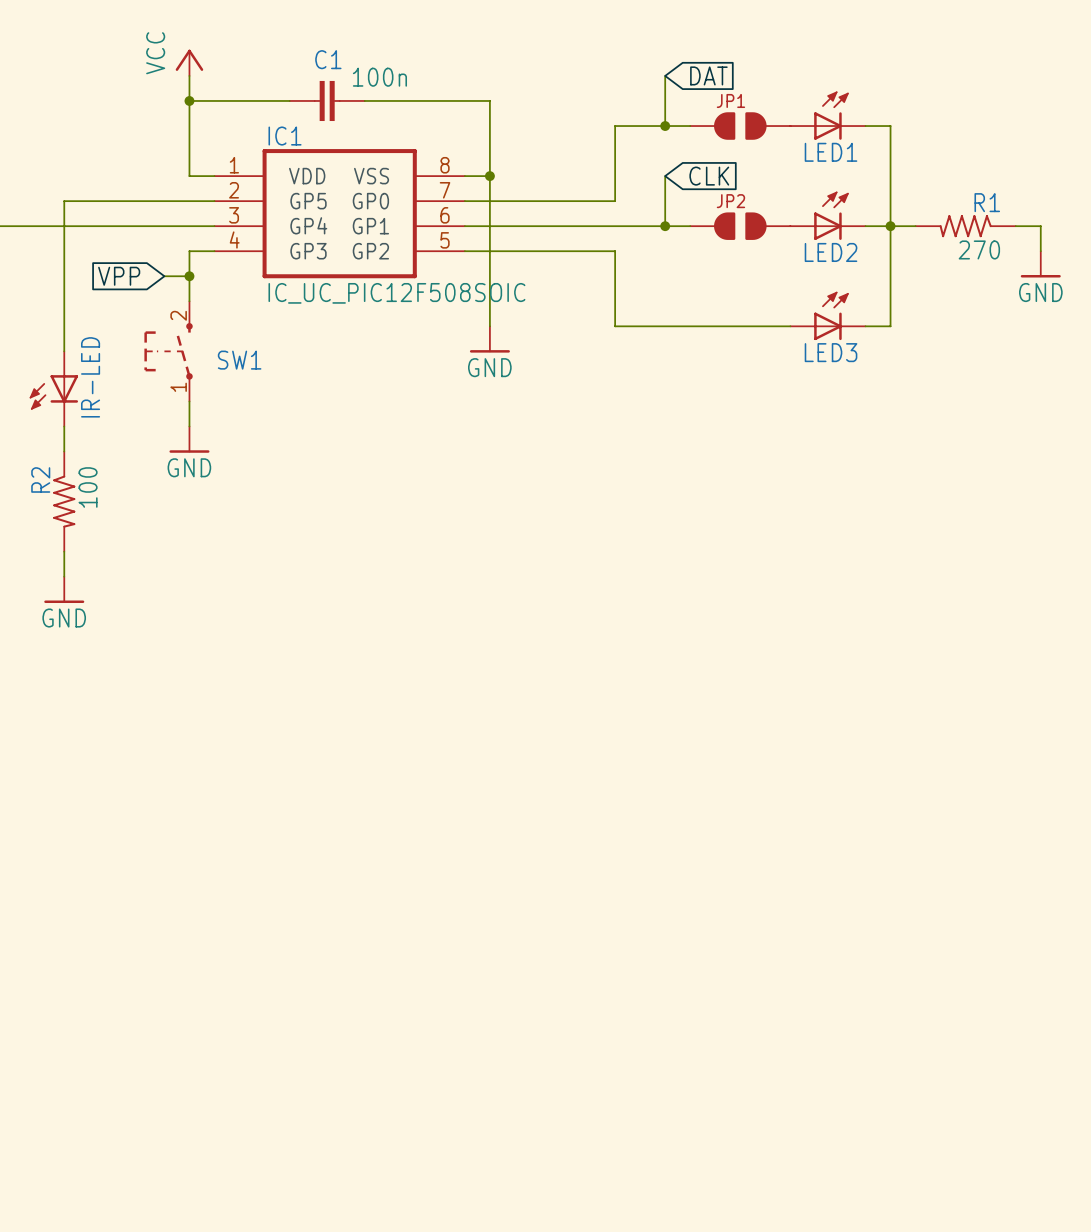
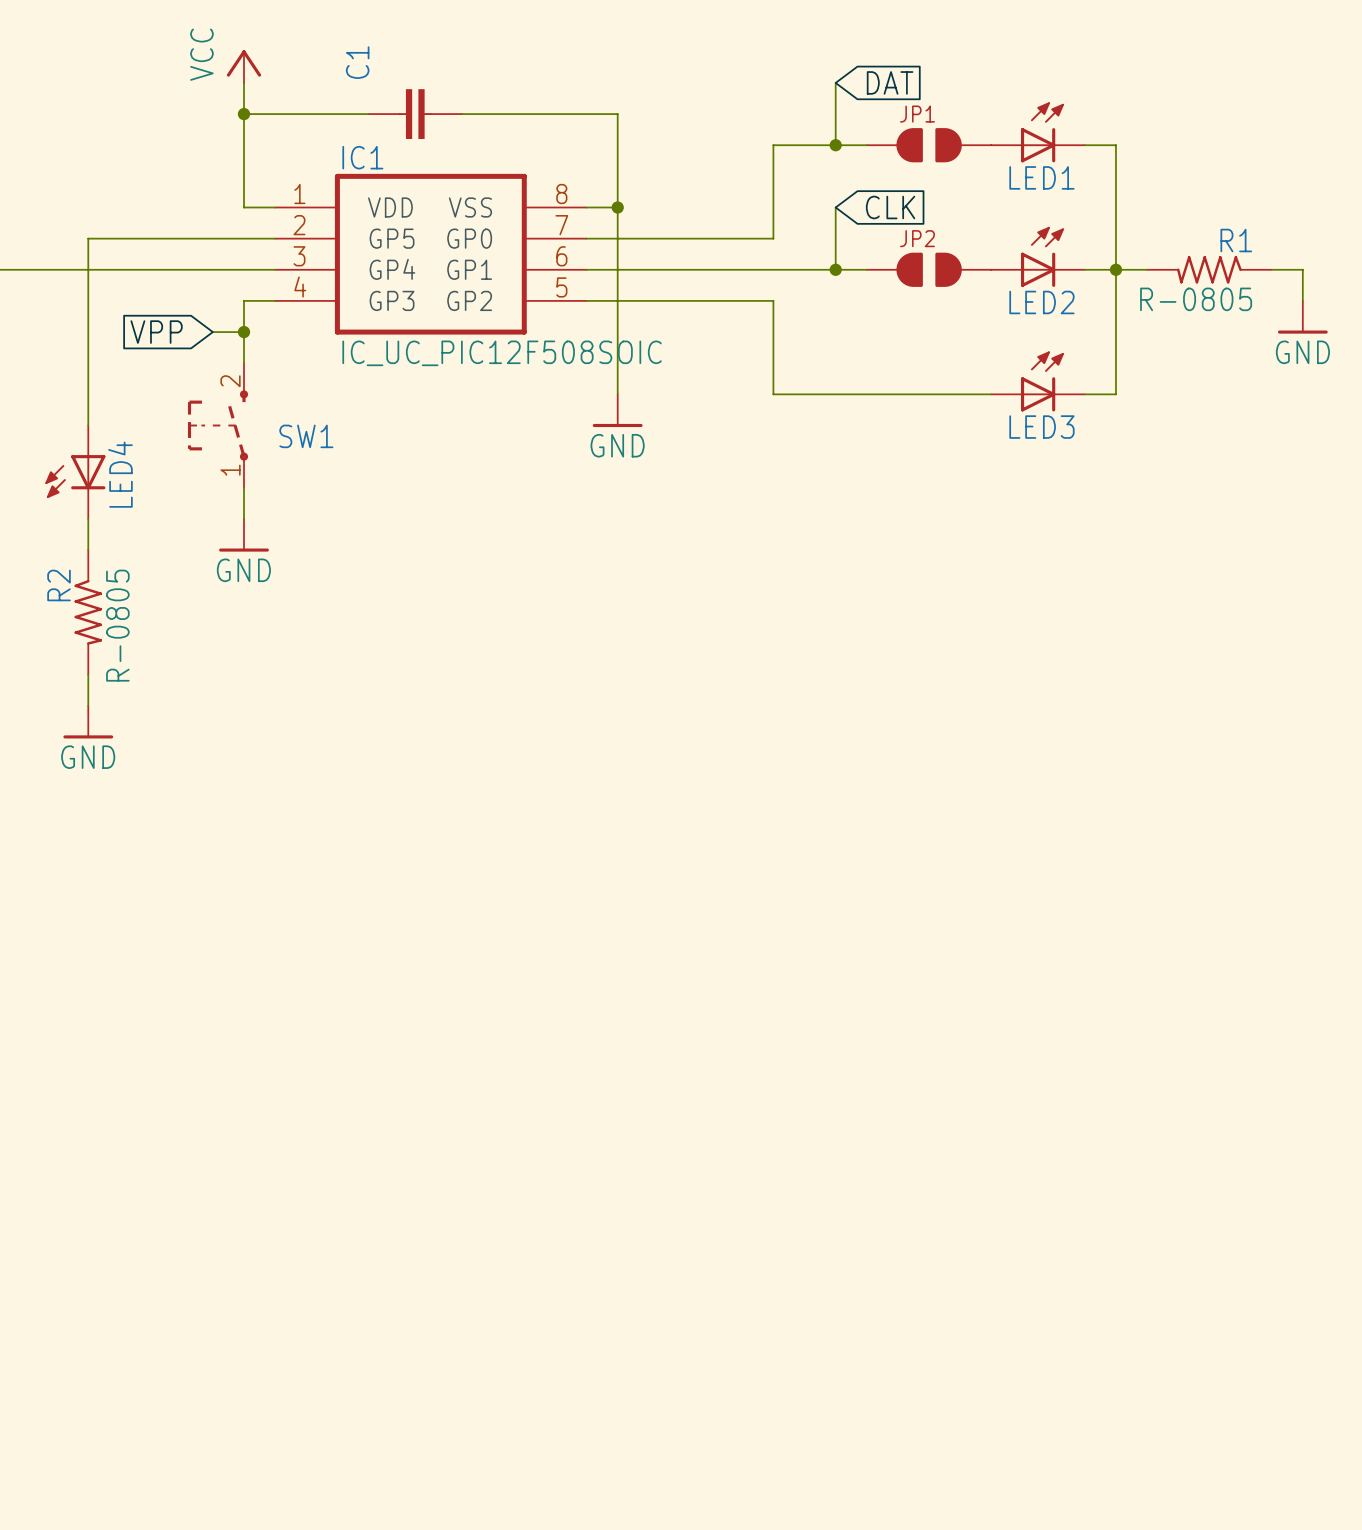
C1 name rotation: 0° (328, 59) -> 90° counterclockwise (357, 62)
C1 name position: C1 (328, 59) -> C1 (357, 62)
C1 value: 100n (379, 77) -> none
R1 value: 270 (979, 249) -> R-0805 (1196, 299)
IR-LED name: IR-LED (90, 377) -> LED4 (120, 474)
R2 value: 100 (88, 487) -> R-0805 (117, 625)

